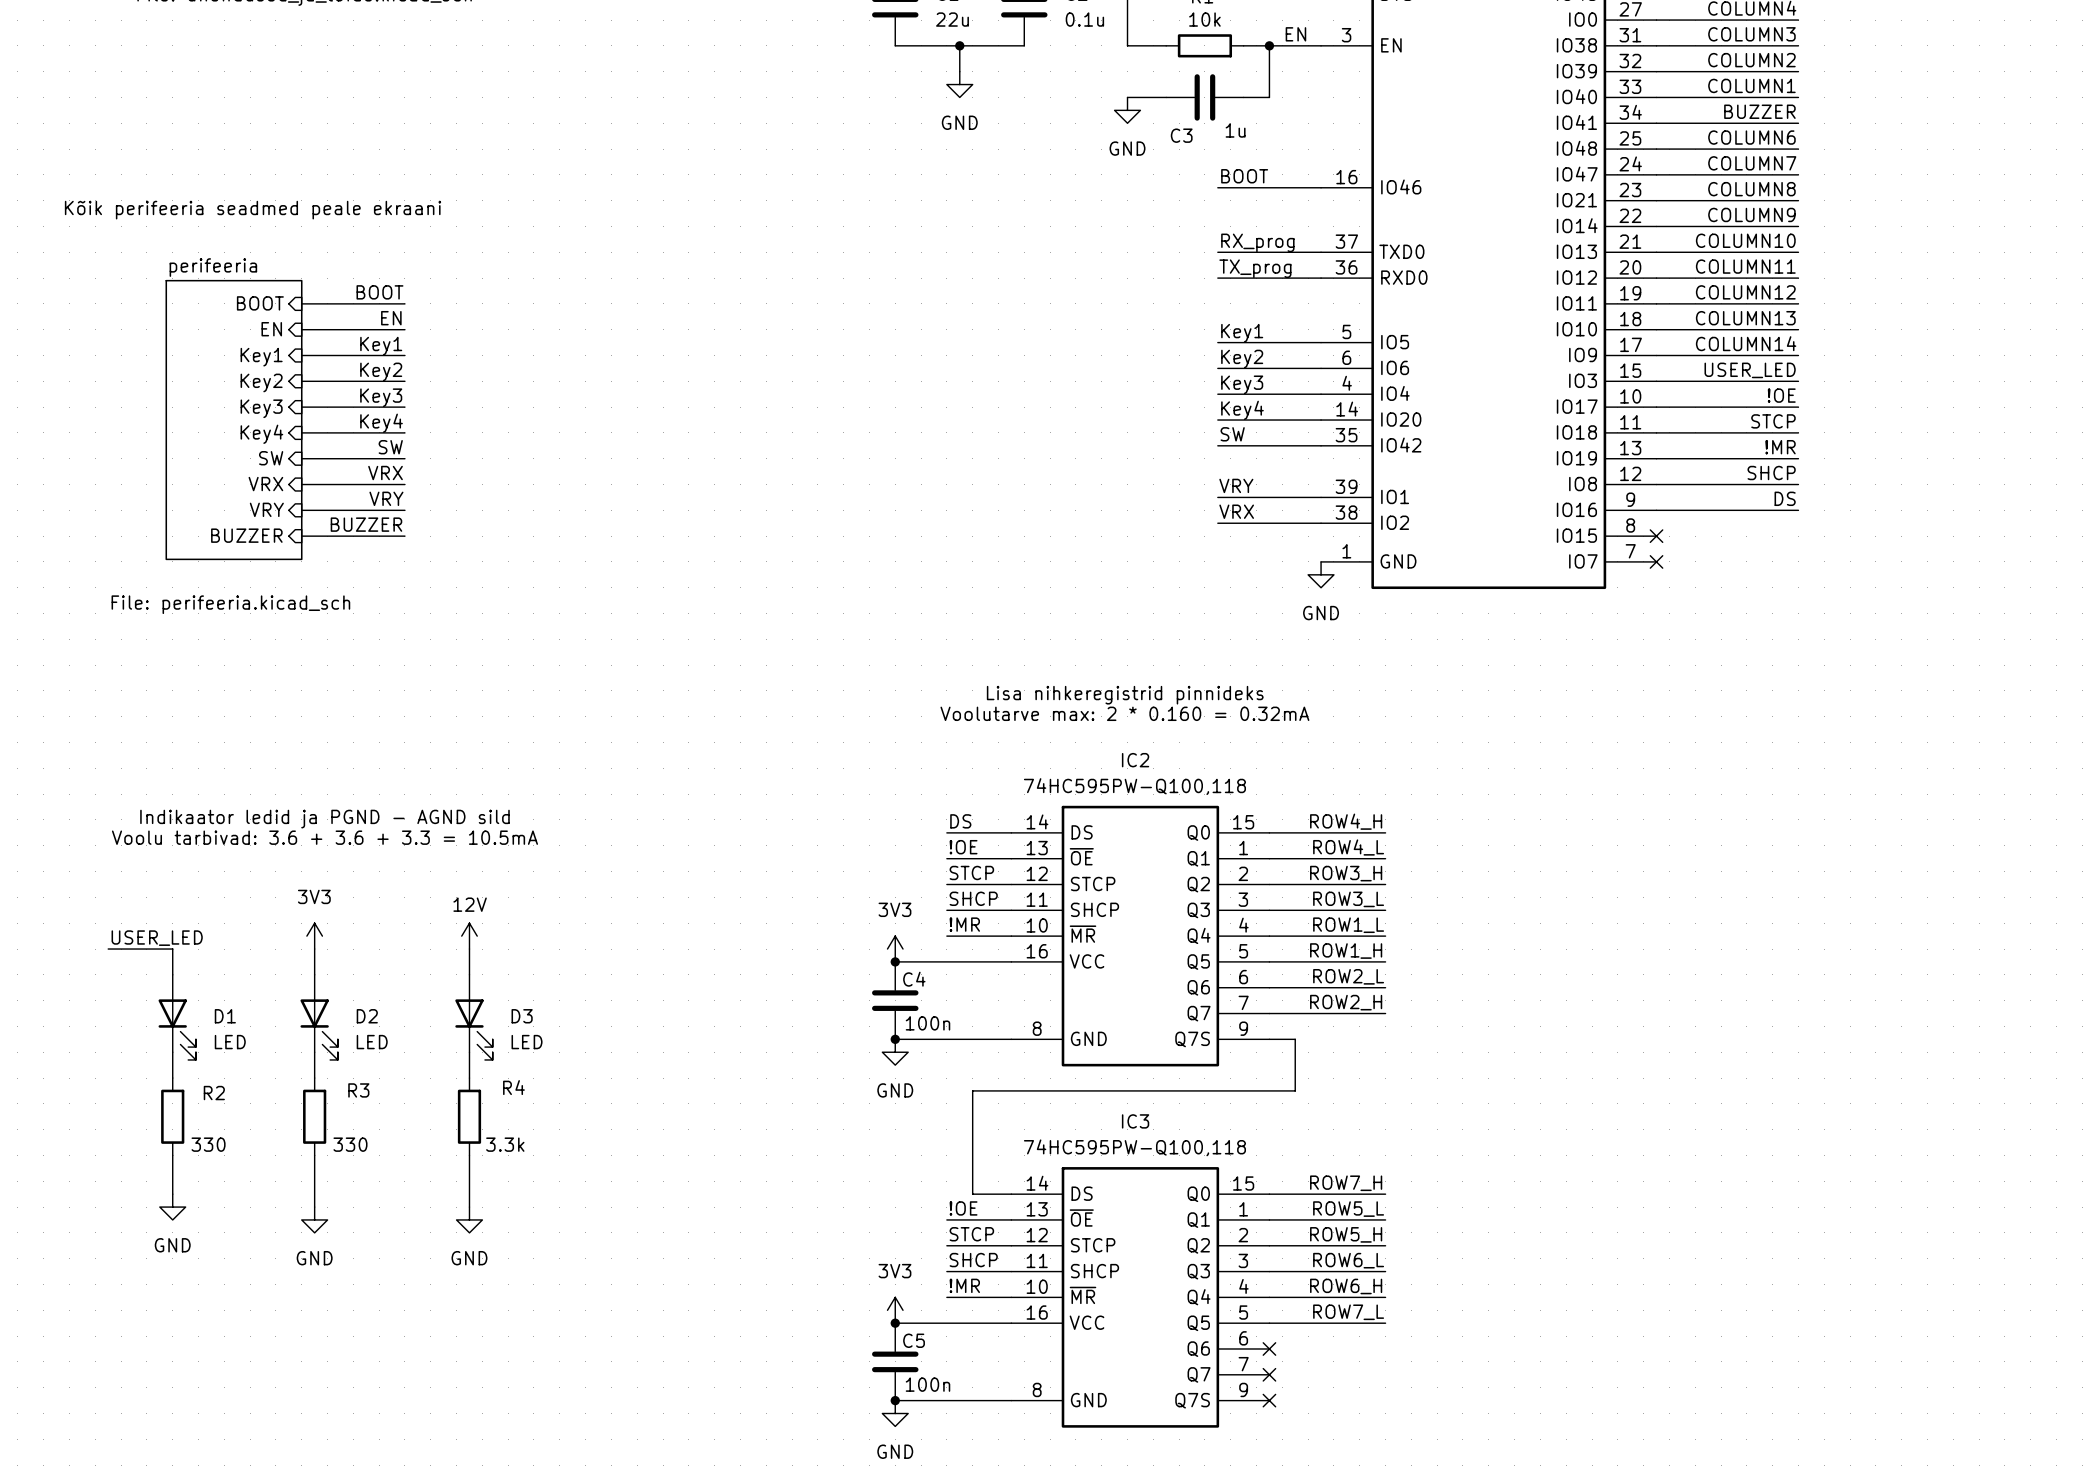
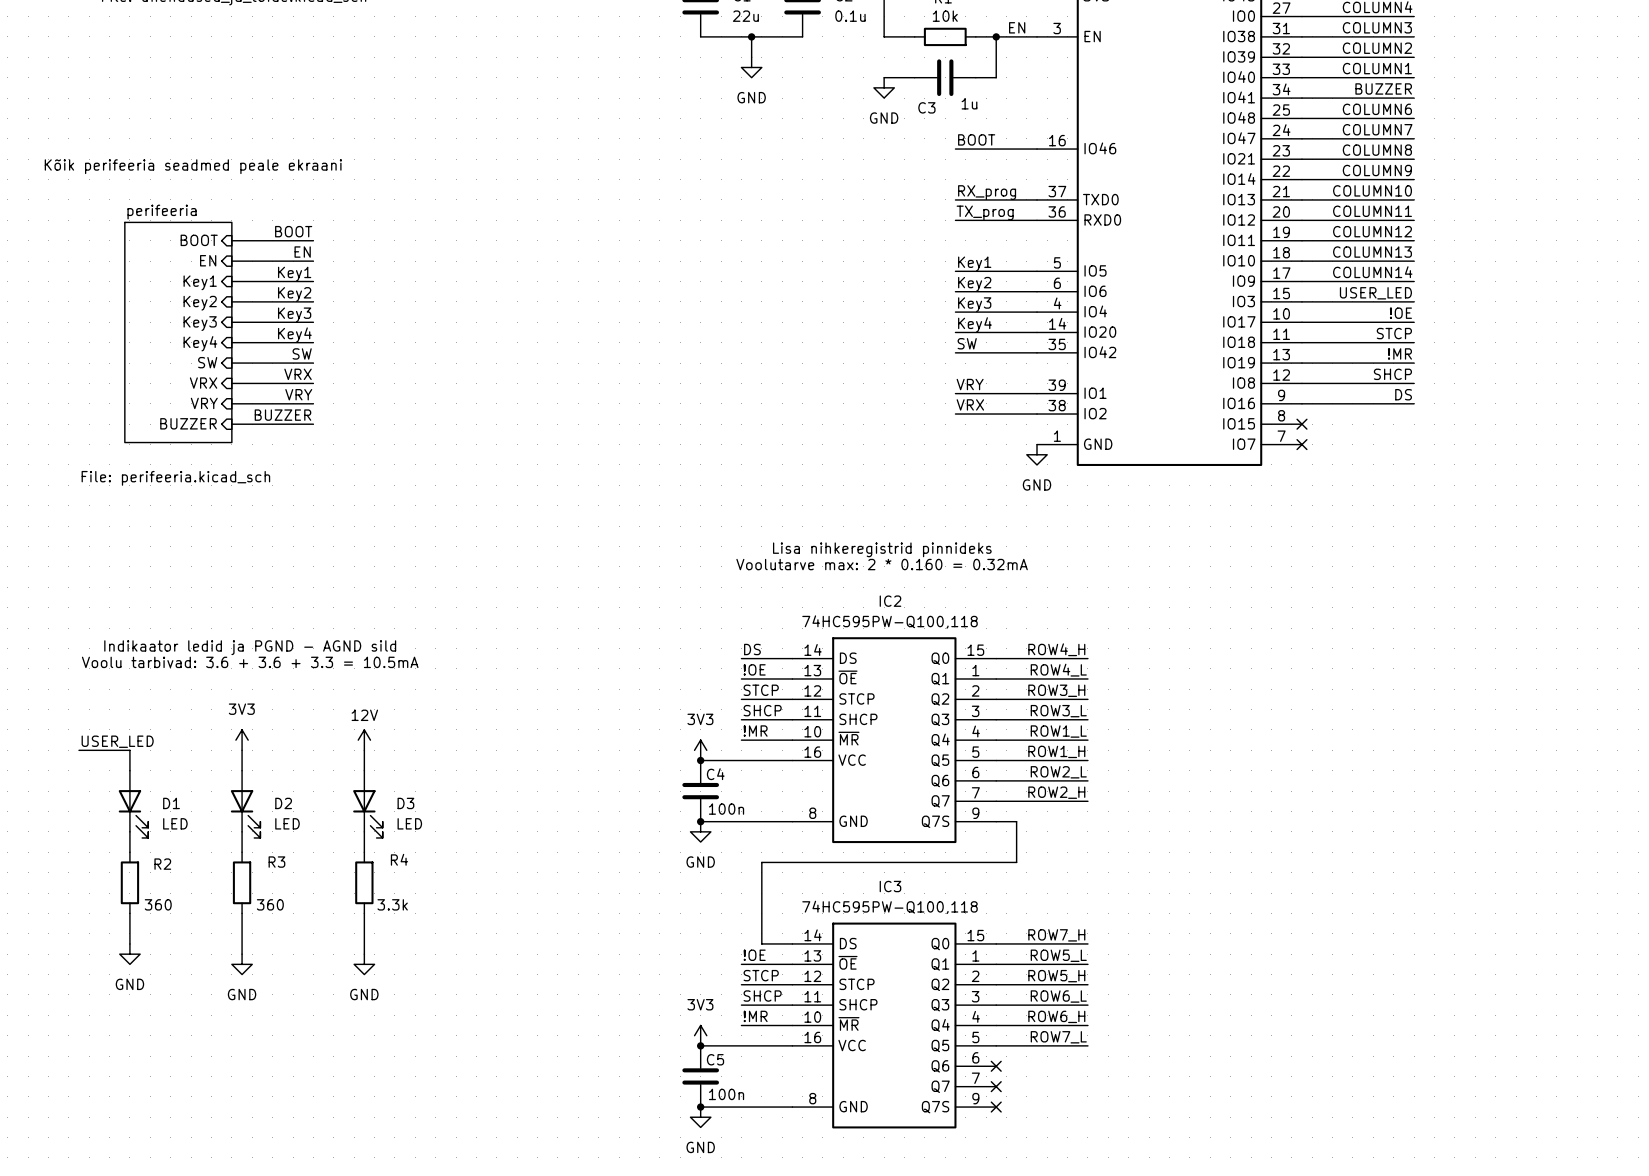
R2 value: 330 (208, 1144) -> 360 (158, 904)
R3 value: 330 (350, 1144) -> 360 (270, 904)

